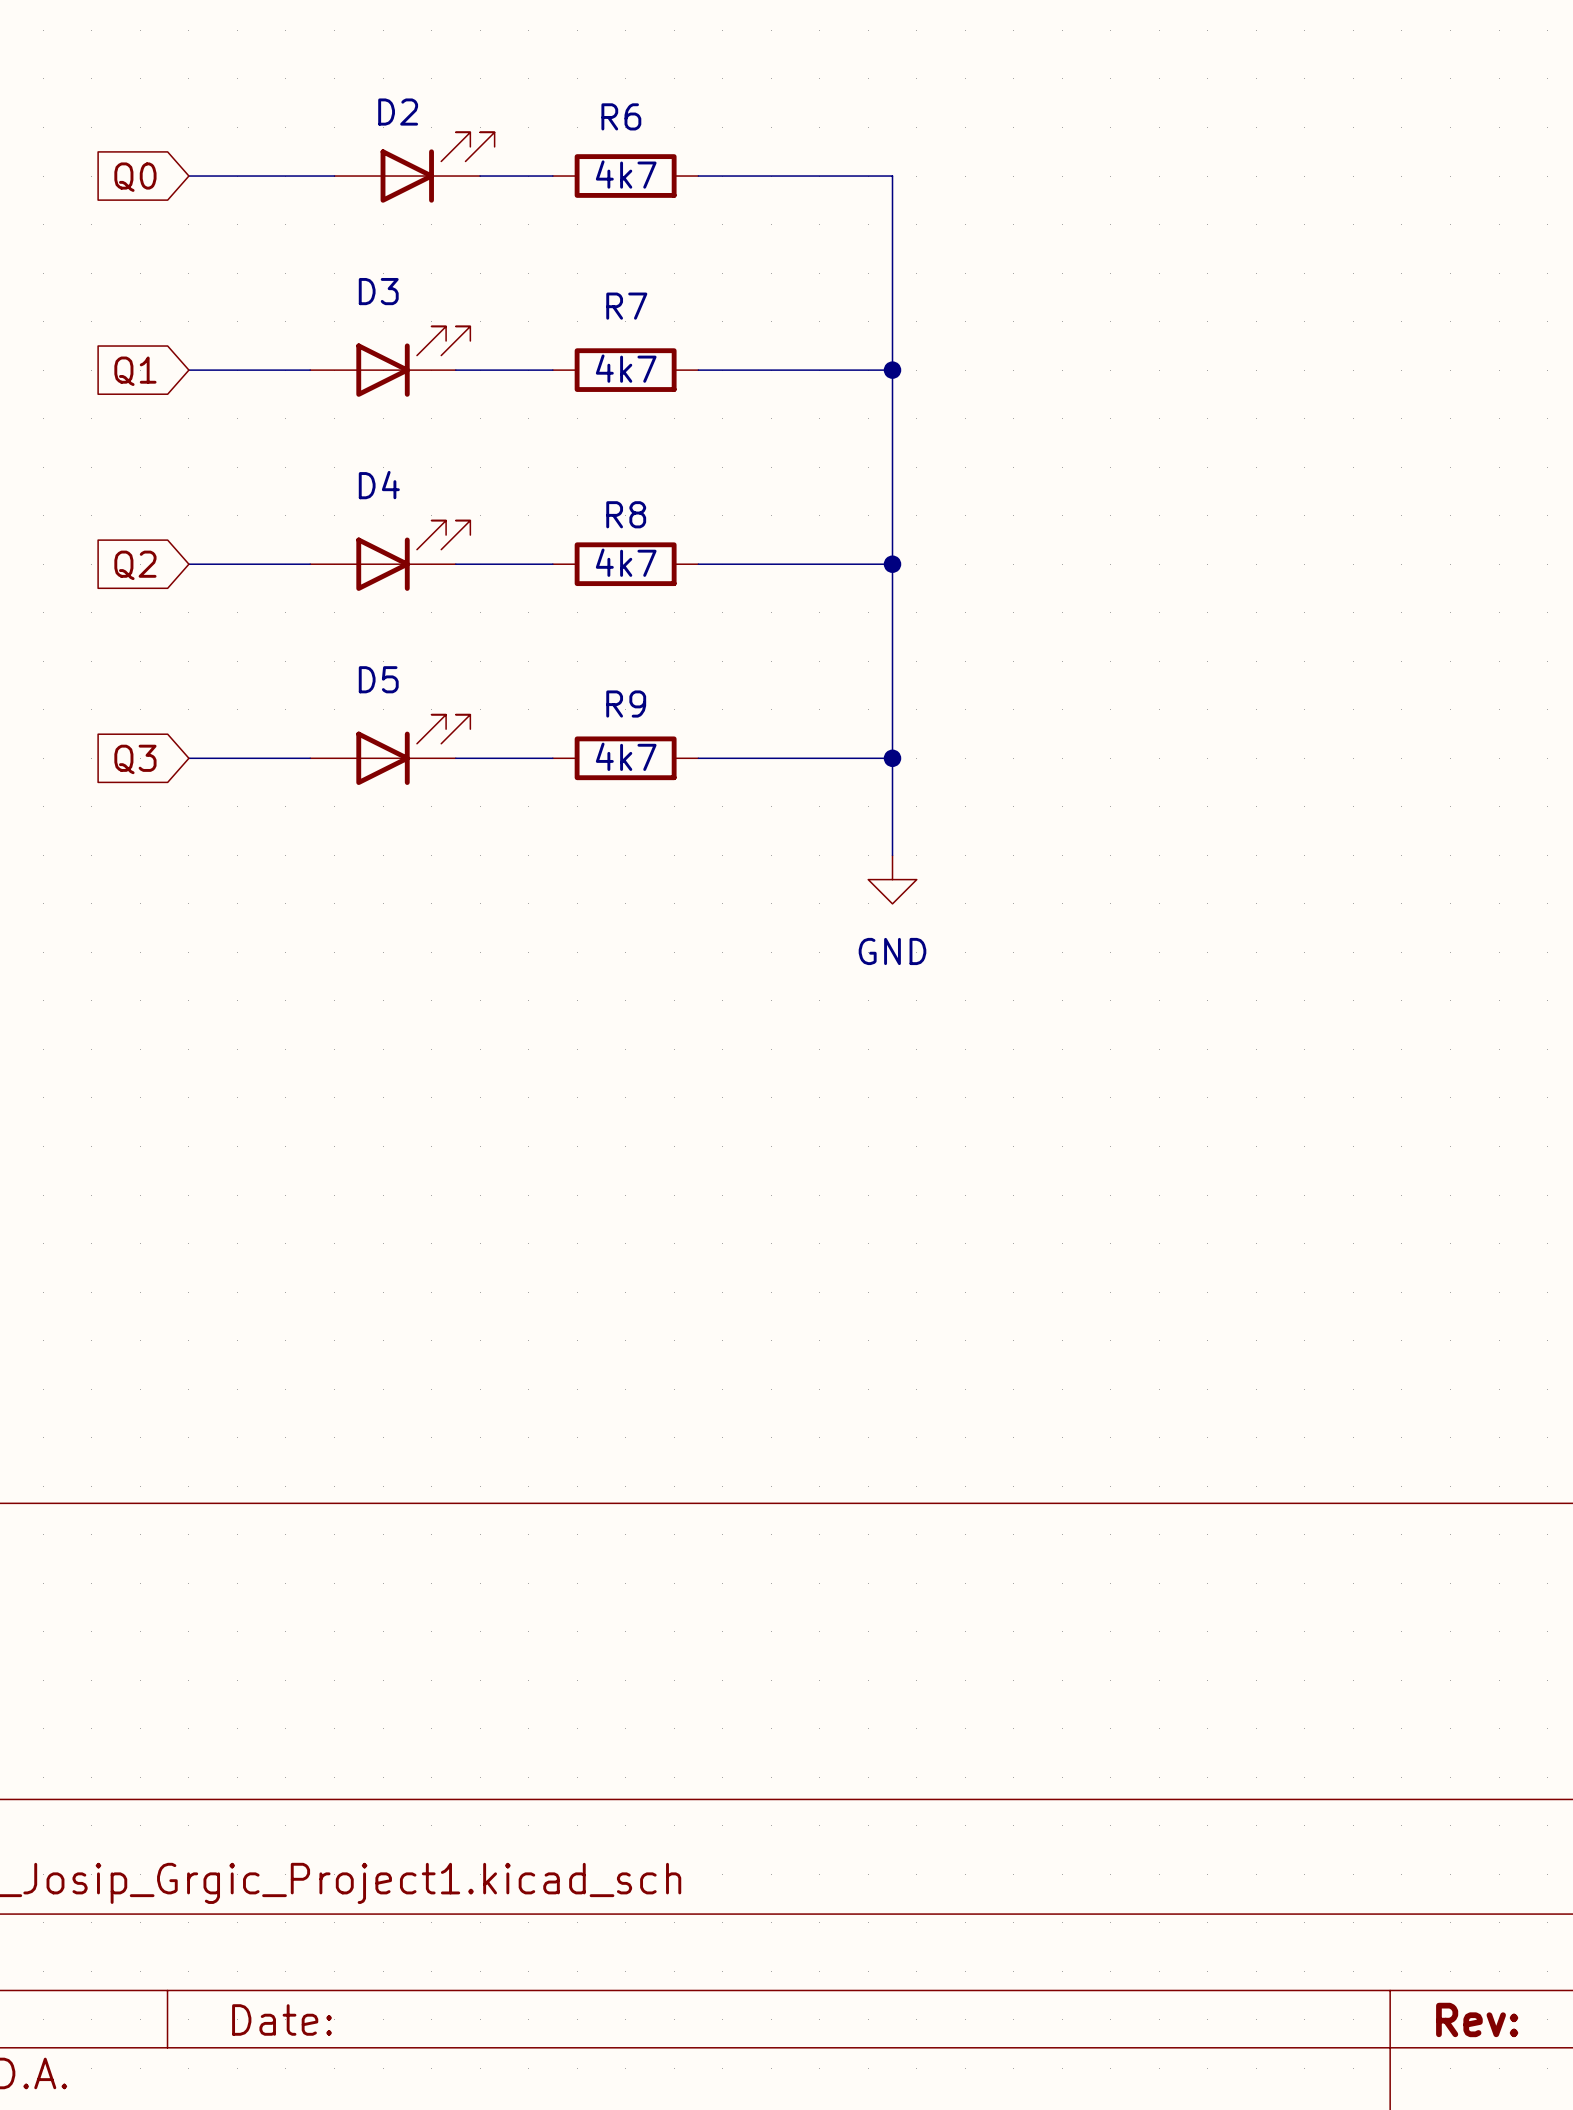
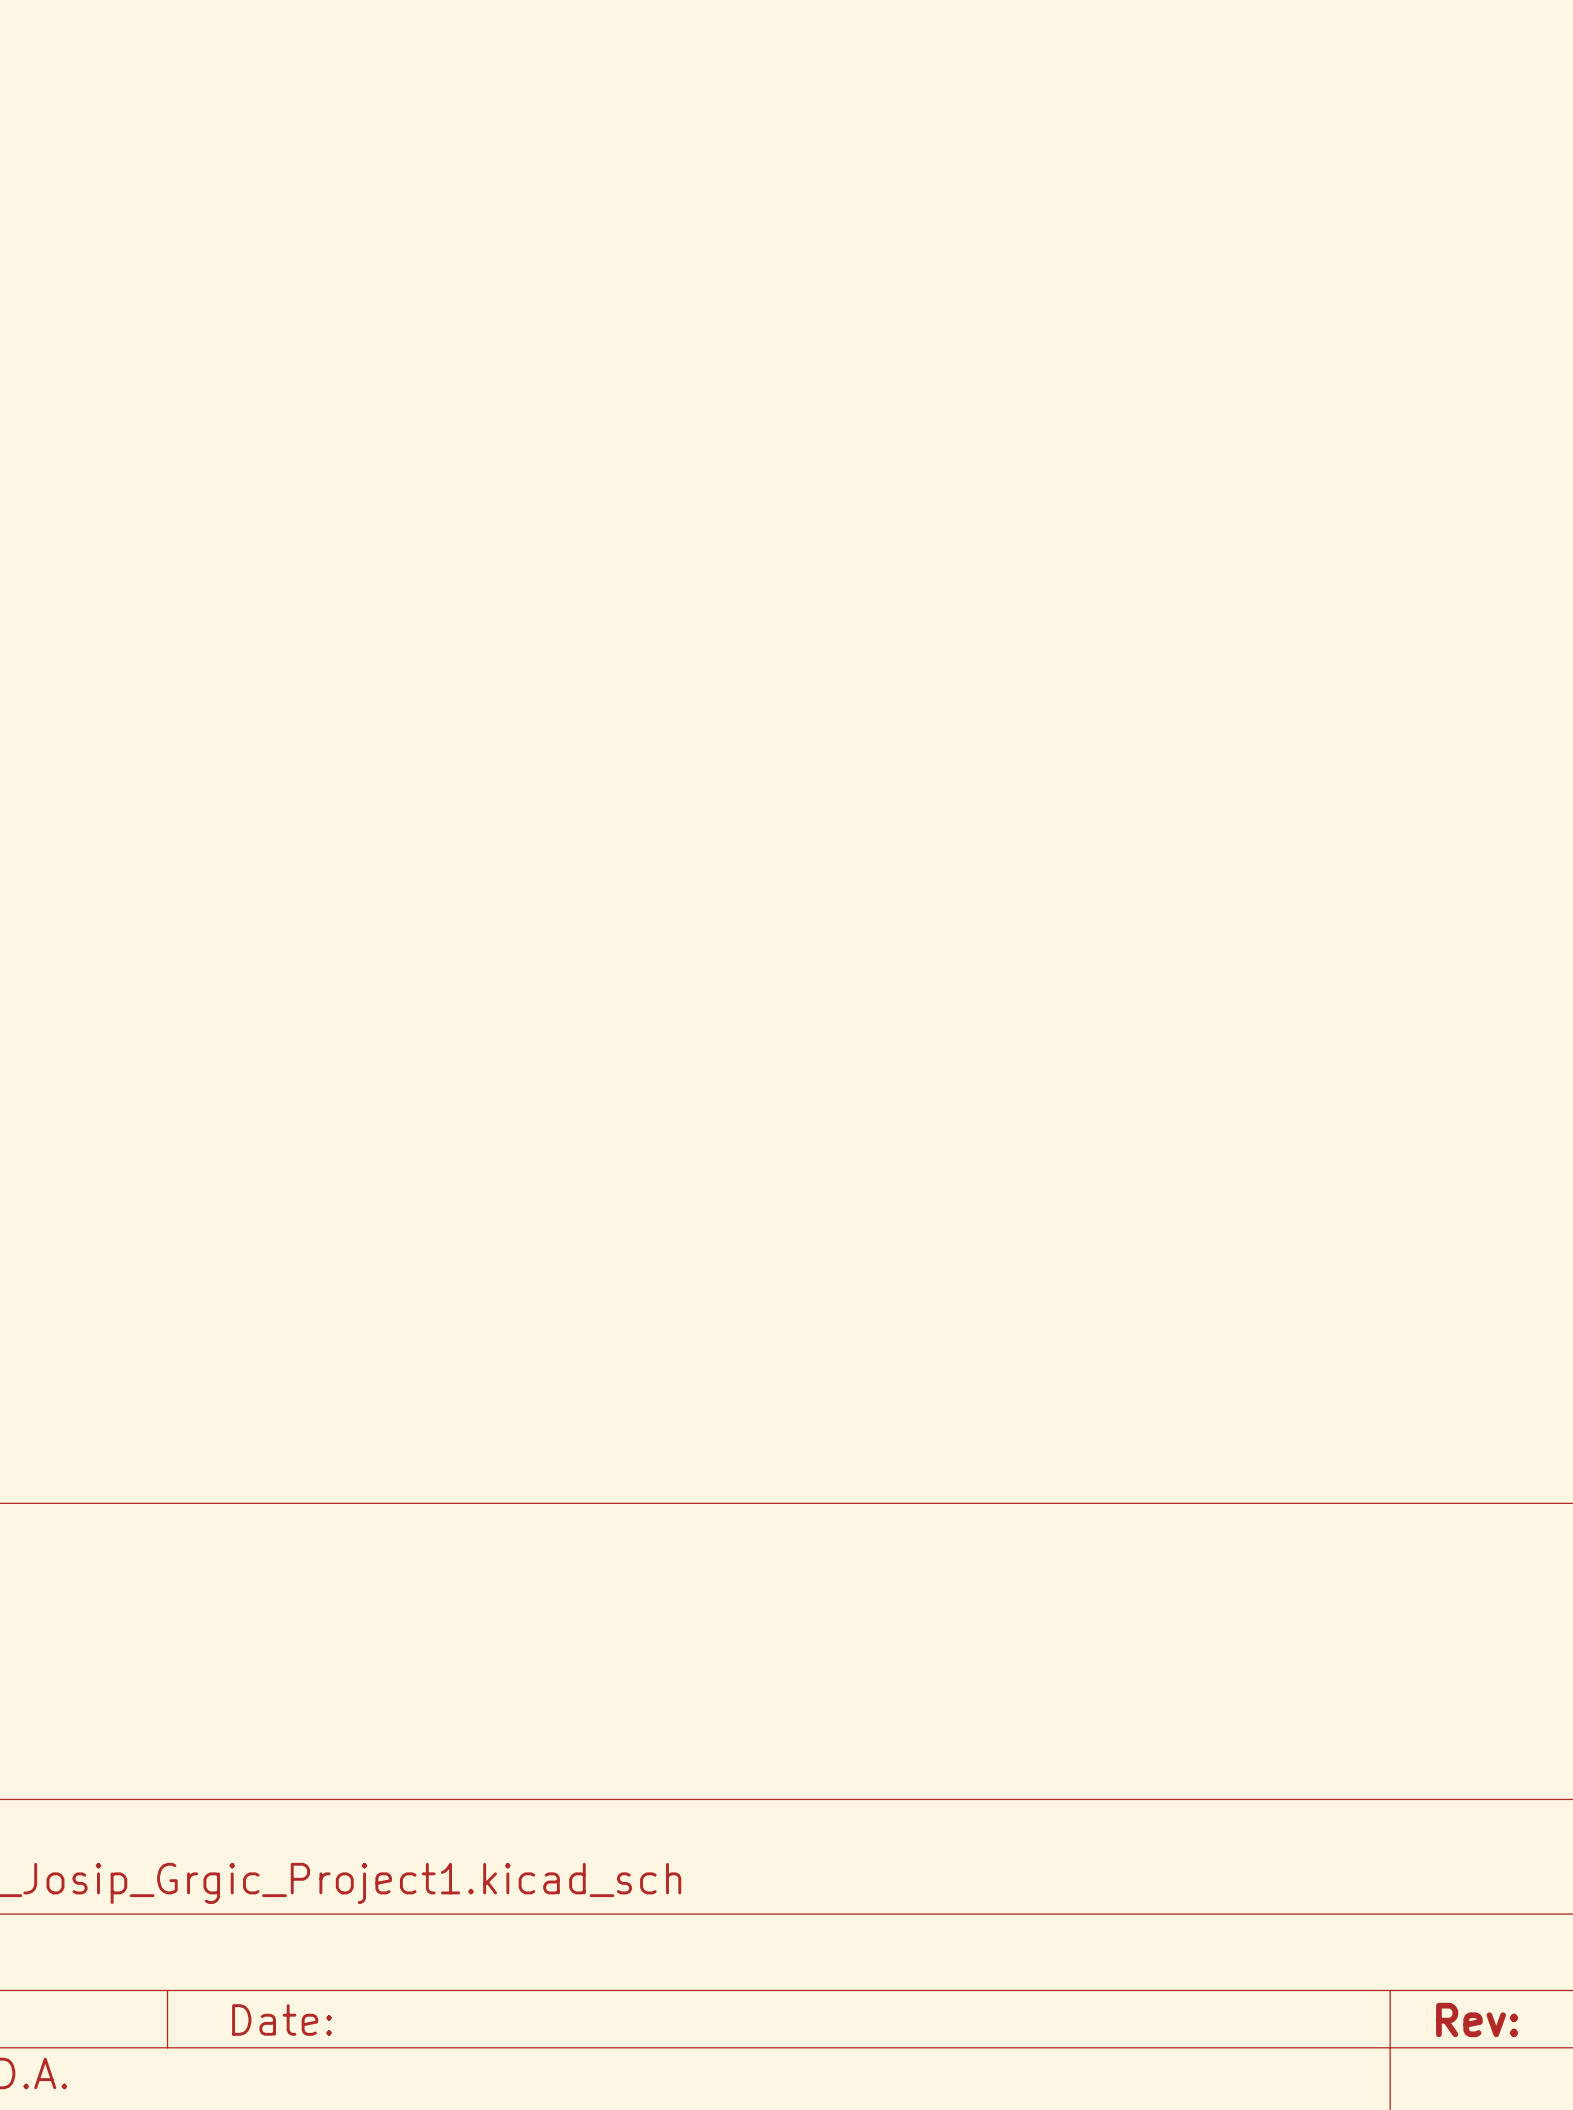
D2: (414, 167) -> none
wire: (188, 176) (334, 176) -> none
wire: (480, 176) (552, 176) -> none
R6: 4k7 (625, 176) -> none
wire: (698, 176) (892, 176) (892, 855) -> none
global label: Q0 (135, 177) -> none
D3: (390, 361) -> none
wire: (188, 370) (310, 370) -> none
wire: (455, 370) (552, 370) -> none
R7: 4k7 (625, 370) -> none
wire: (698, 370) (892, 370) -> none
junction: (892, 370) -> none
global label: Q1 (135, 371) -> none
D4: (390, 555) -> none
wire: (188, 564) (310, 564) -> none
wire: (455, 564) (552, 564) -> none
R8: 4k7 (625, 564) -> none
wire: (698, 564) (892, 564) -> none
junction: (892, 564) -> none
global label: Q2 (135, 565) -> none
D5: (390, 749) -> none
wire: (188, 758) (310, 758) -> none
wire: (455, 758) (552, 758) -> none
R9: 4k7 (625, 758) -> none
wire: (698, 758) (892, 758) -> none
junction: (892, 758) -> none
global label: Q3 (135, 759) -> none
power symbol: GND (892, 879) -> none

